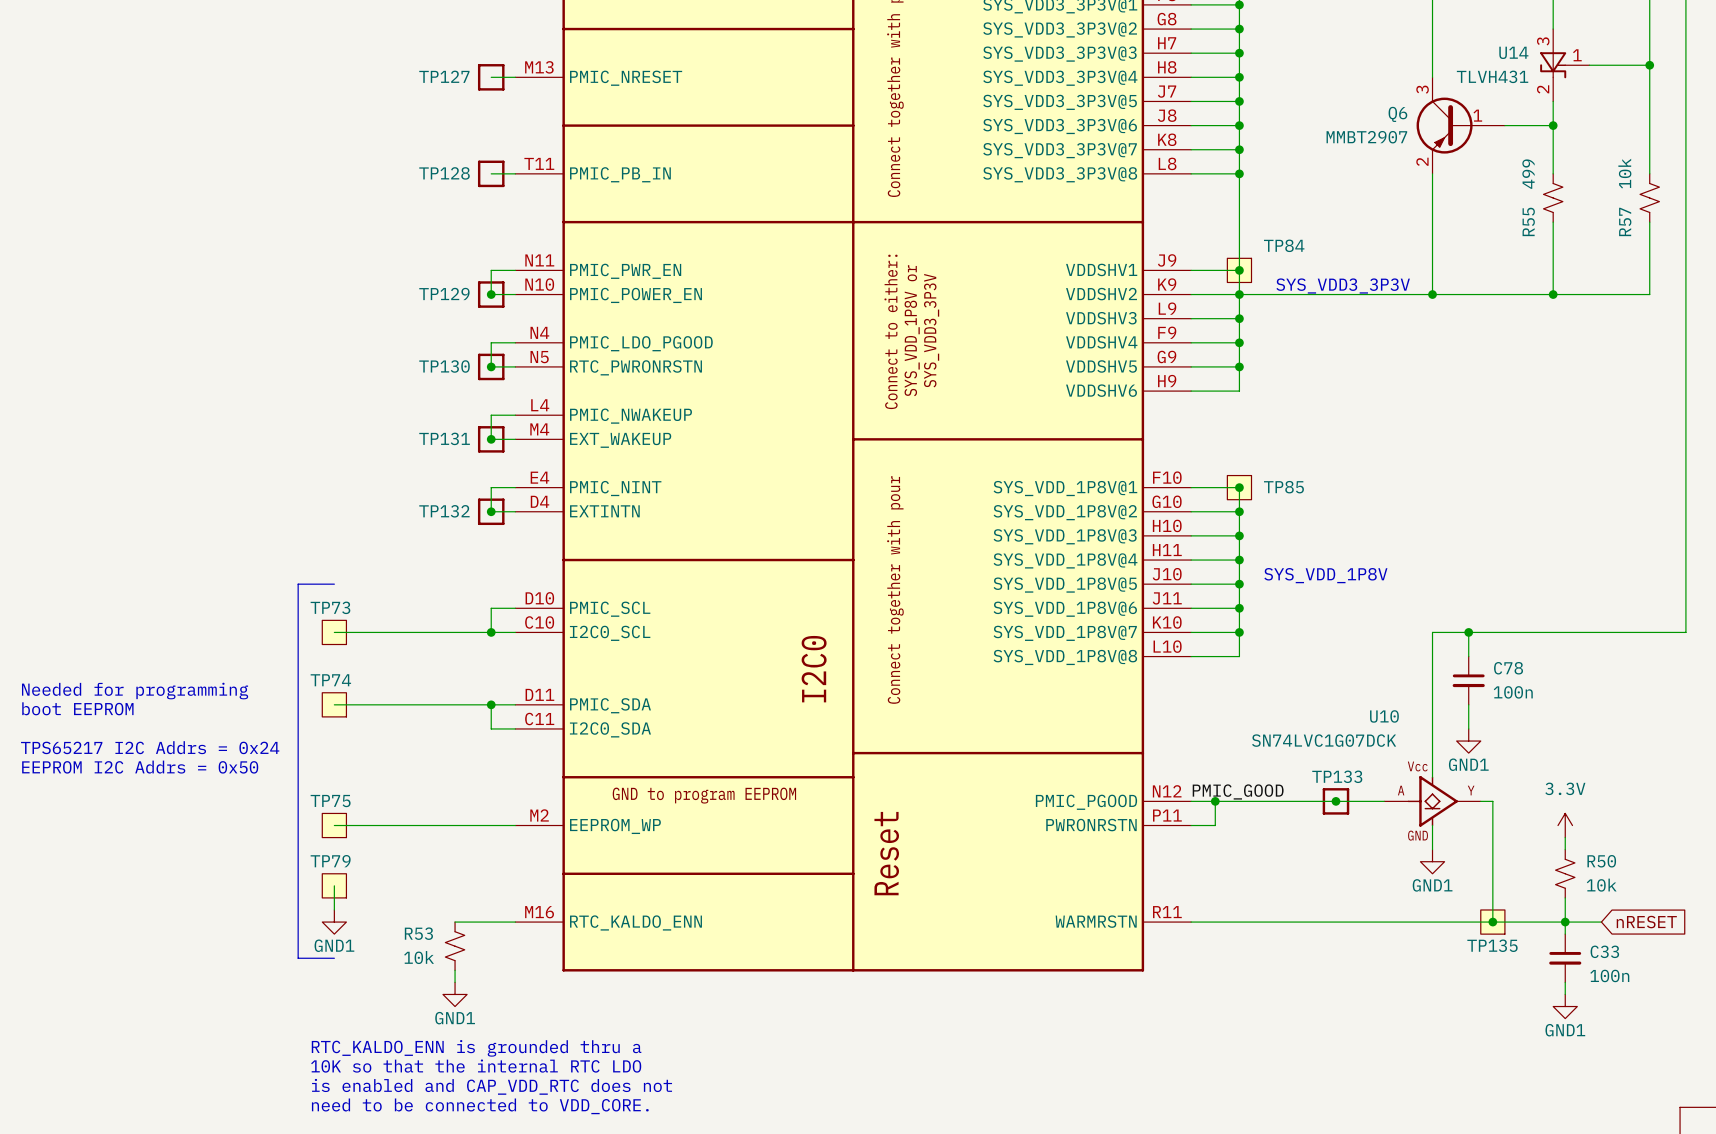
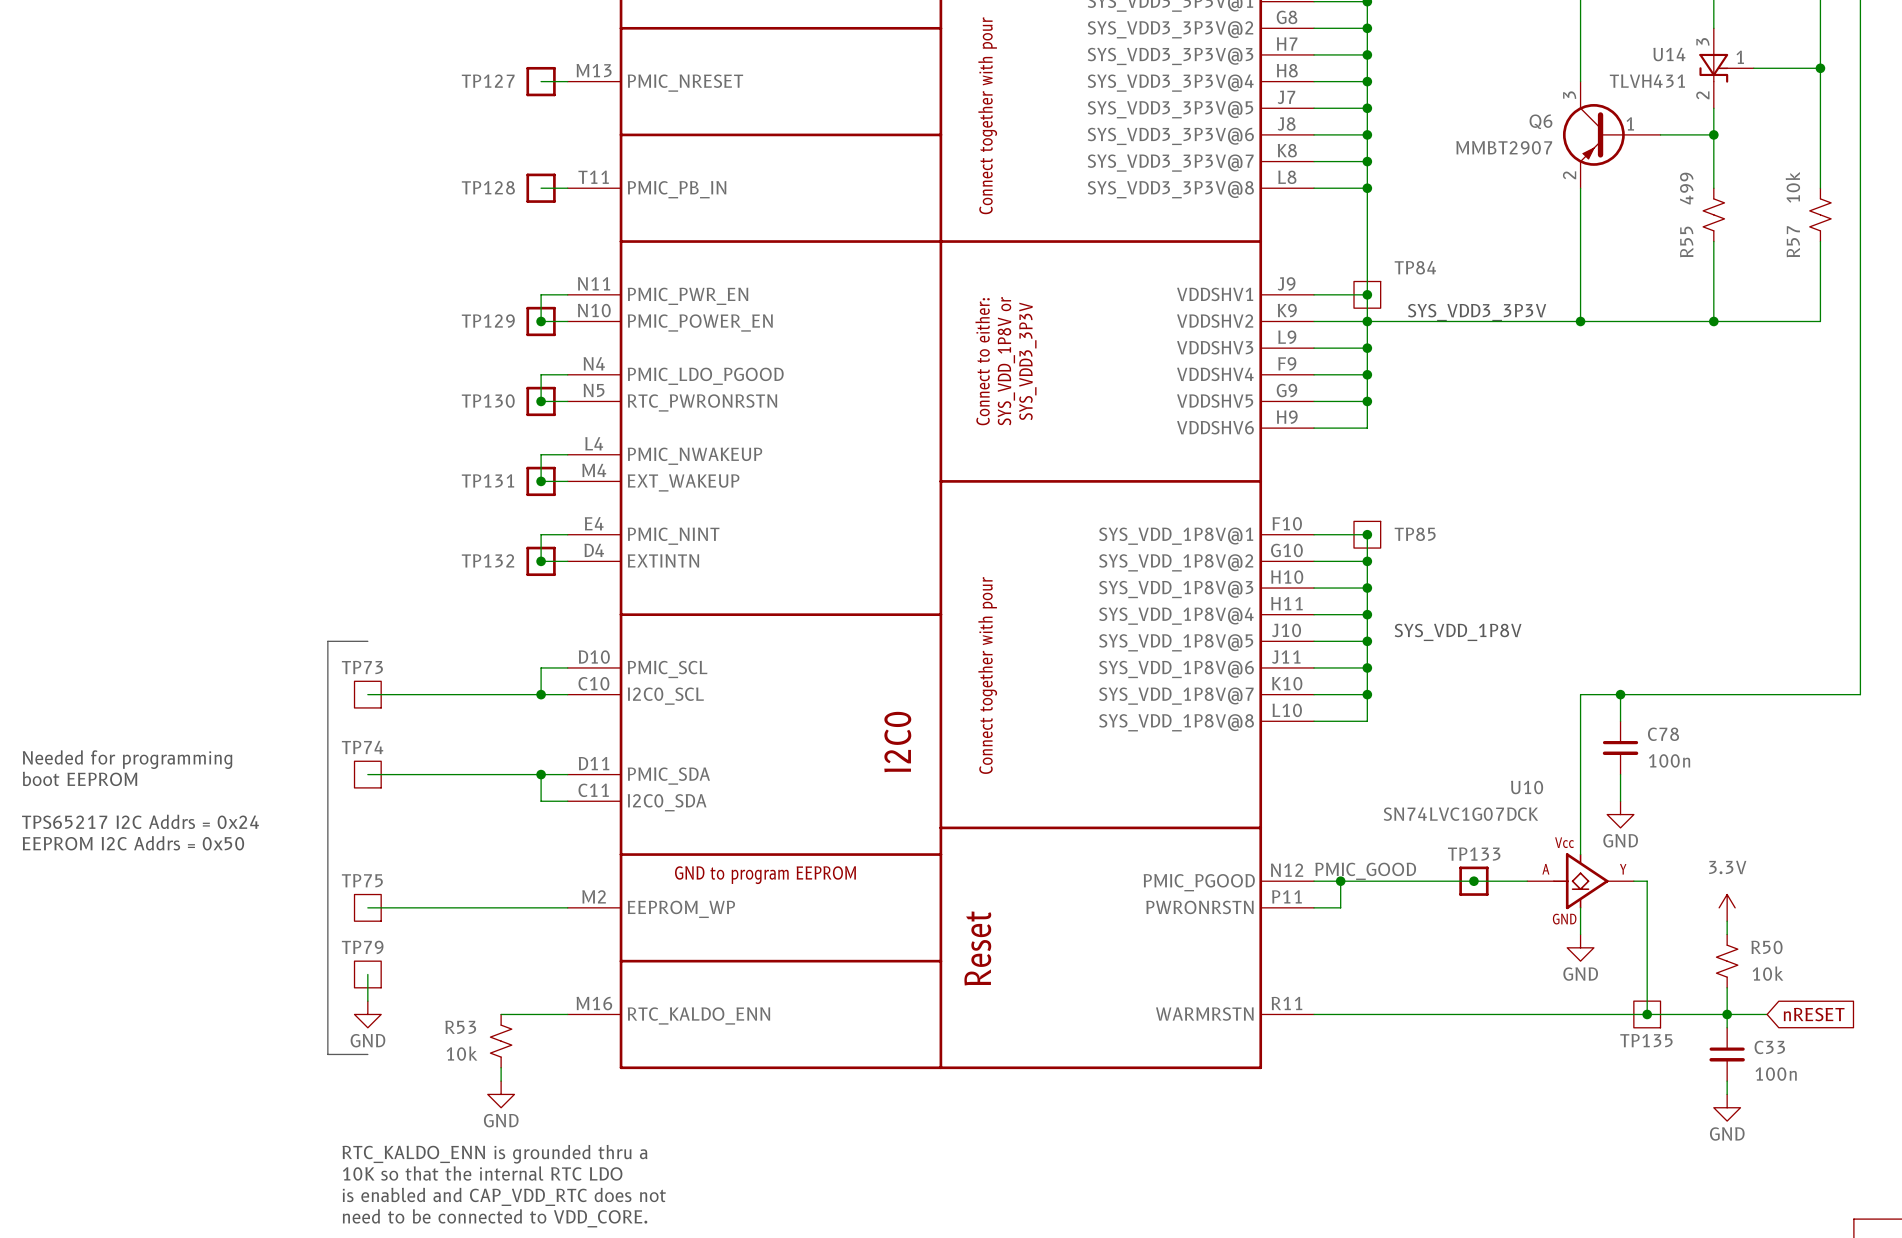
power symbol: GND1 (1468, 741) -> GND (1620, 814)
power symbol: GND1 (1432, 861) -> GND (1580, 947)
power symbol: GND1 (334, 922) -> GND (367, 1014)
power symbol: GND1 (455, 994) -> GND (501, 1094)
power symbol: GND1 (1565, 1006) -> GND (1727, 1107)

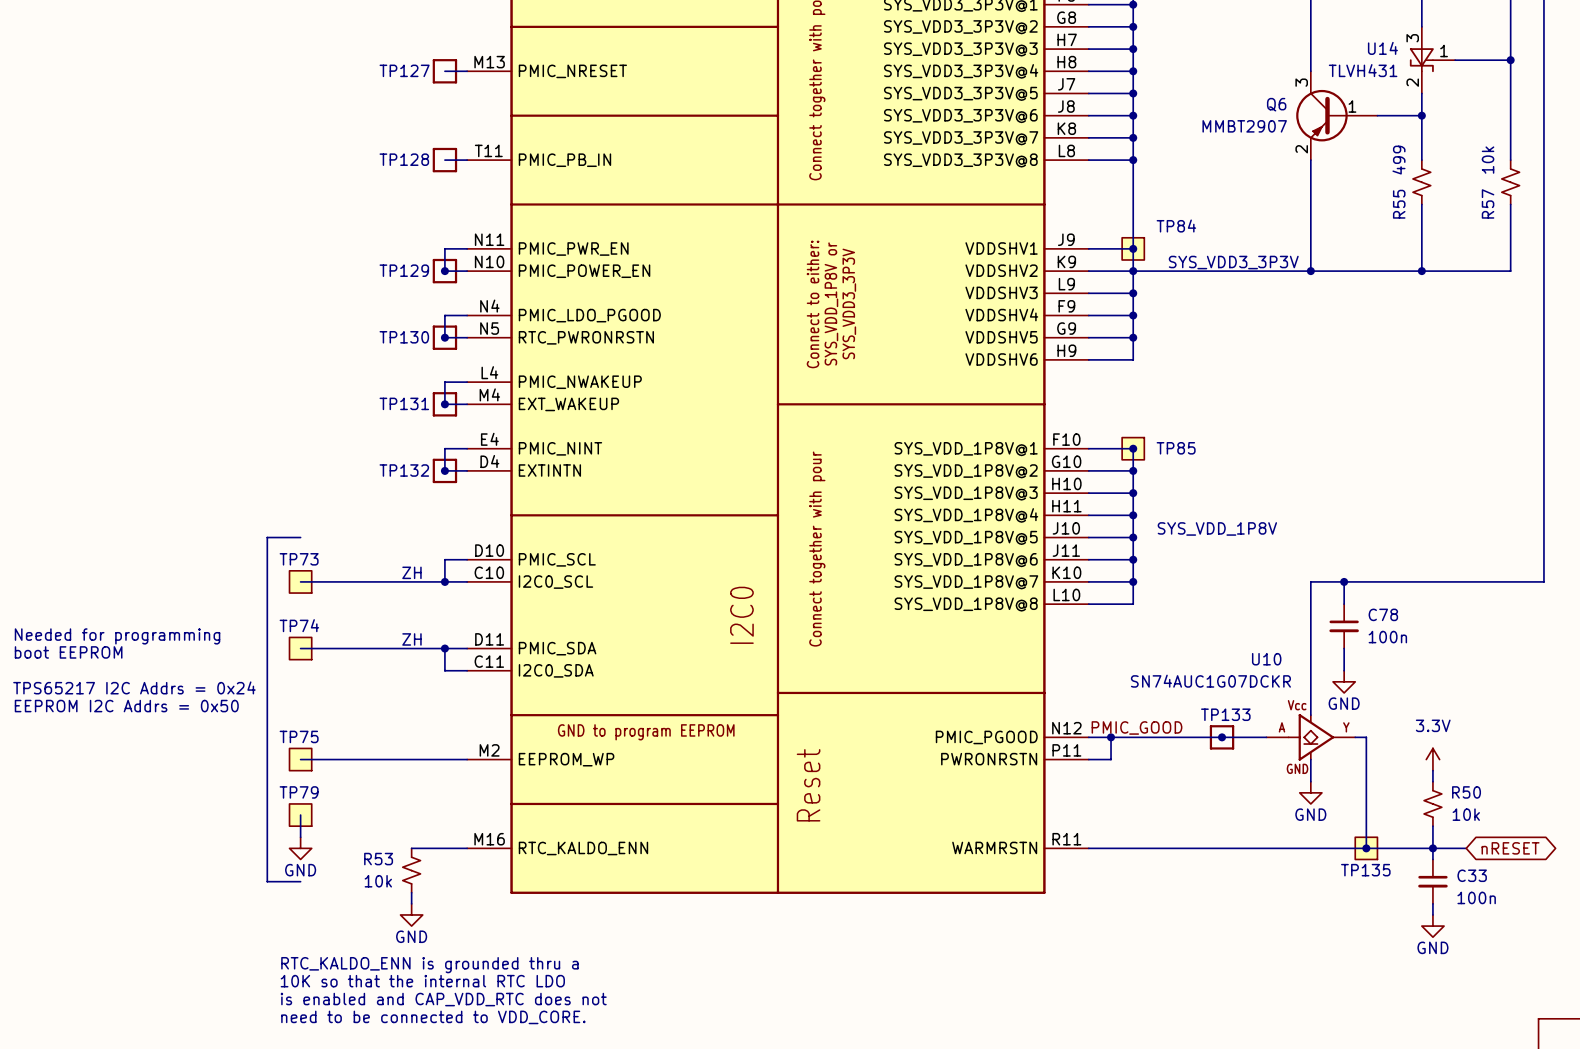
text: none -> ZH (411, 572)
text: none -> ZH (411, 639)
U10 value: SN74LVC1G07DCK (1460, 814) -> SN74AUC1G07DCKR (1210, 681)
global label shape: input (1814, 1014) -> bidirectional (1510, 848)

